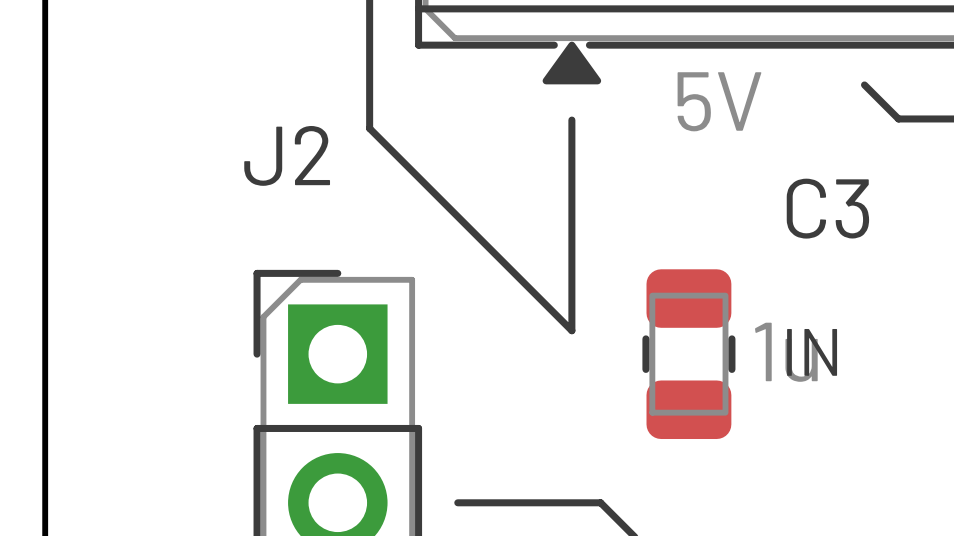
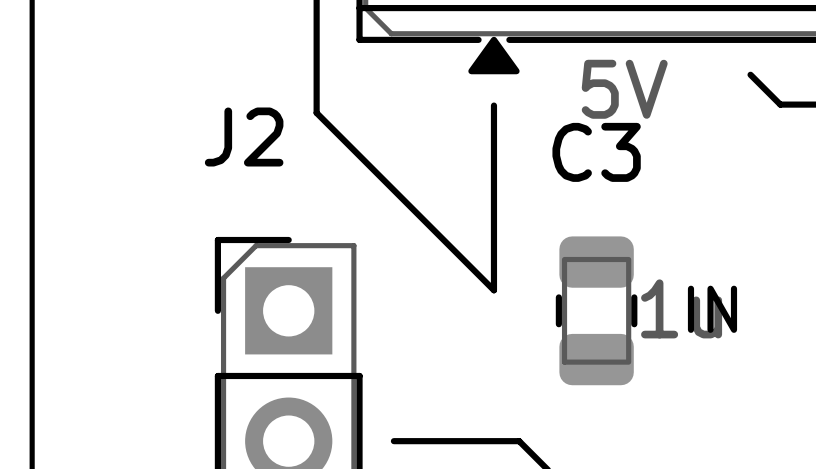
C3 name position: C3 (827, 208) -> C3 (596, 152)

